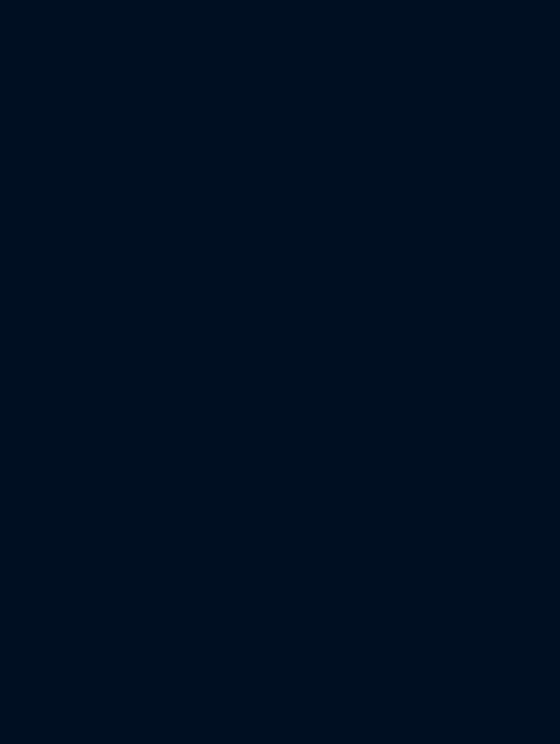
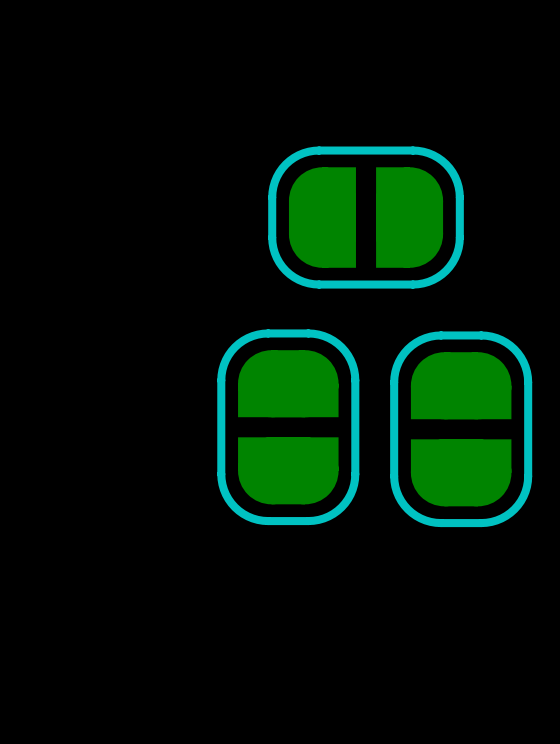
part: none -> (366, 217)
part: none -> (288, 427)
part: none -> (461, 429)

